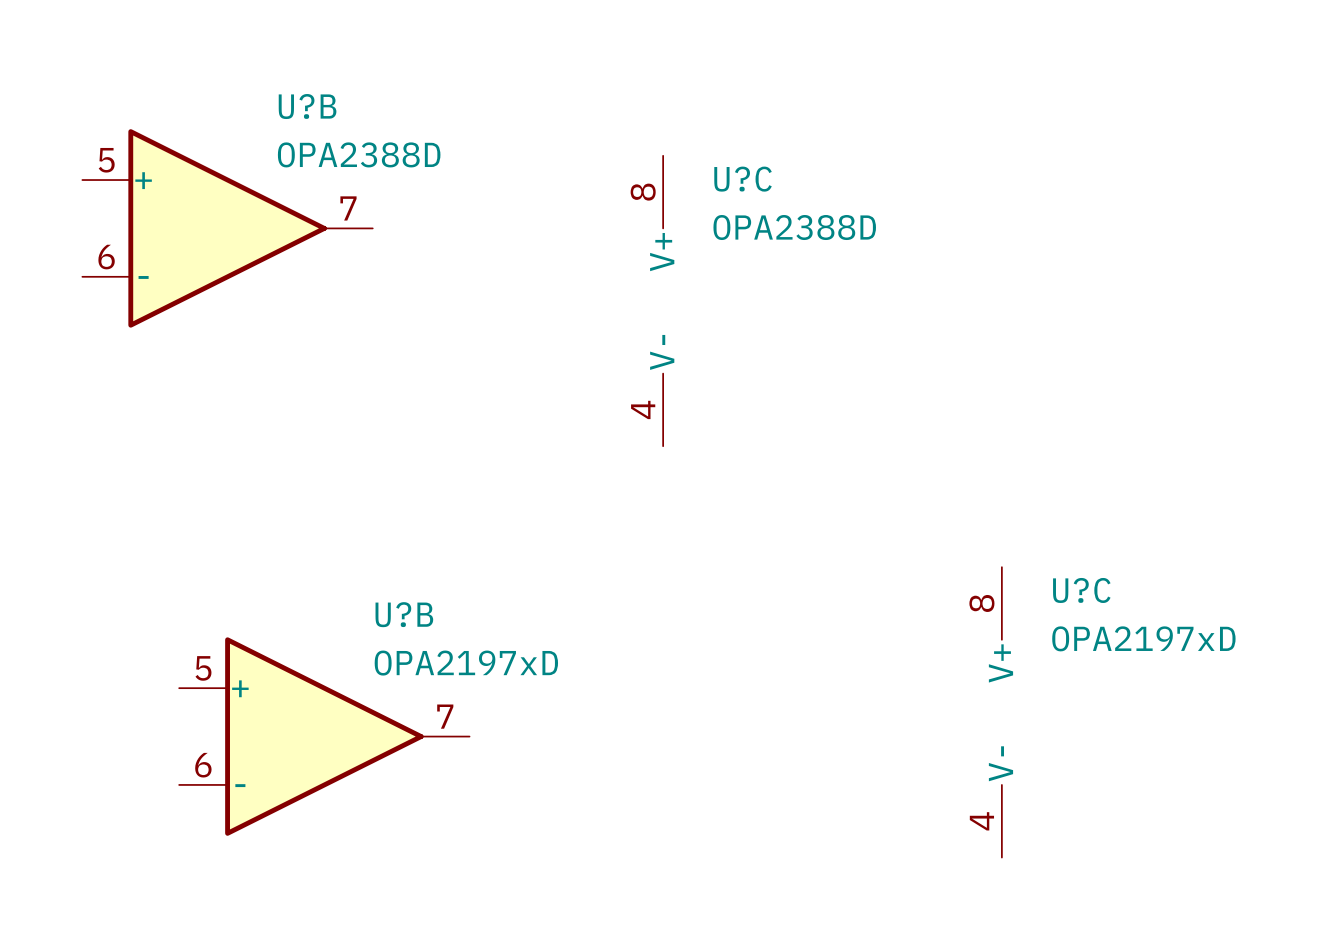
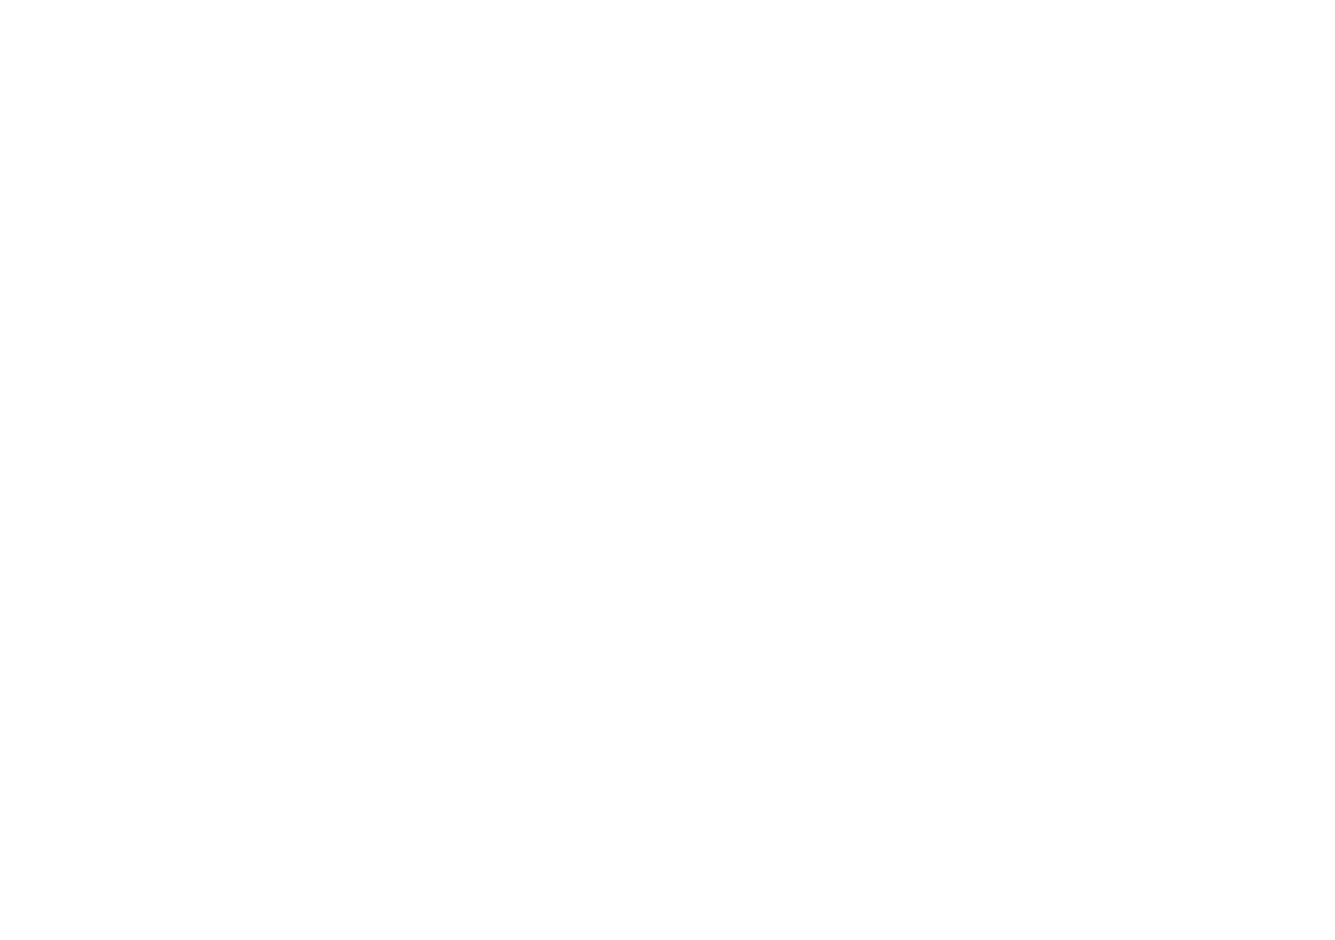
U?B: OPA2388D (227, 228) -> none
U?C: OPA2388D (663, 301) -> none
U?C: OPA2197xD (1001, 712) -> none
U?B: OPA2197xD (324, 736) -> none

